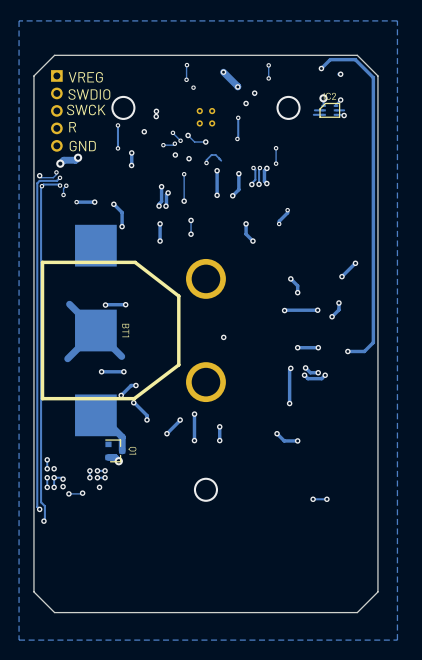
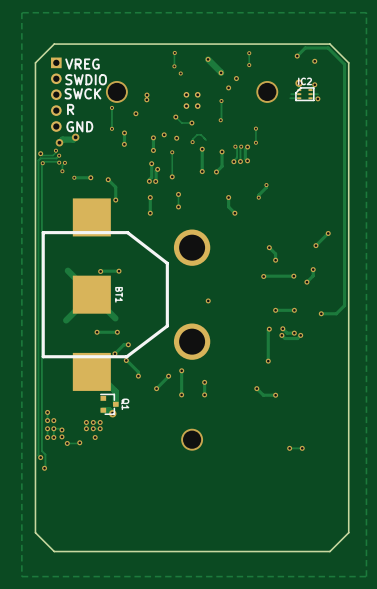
track: (172, 132) (180, 140) -> none
via: (172, 132) -> none
via: (180, 140) -> none
track: (174, 143) (163, 145) -> none
via: (174, 143) -> none
via: (163, 145) -> none
track: none -> (153, 137) (153, 150)
via: none -> (153, 137)
via: none -> (153, 150)

